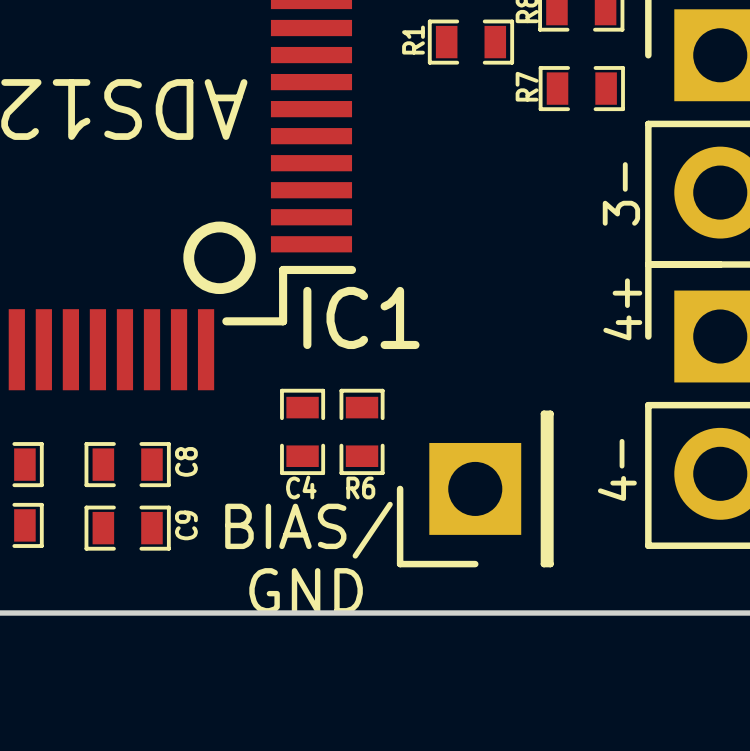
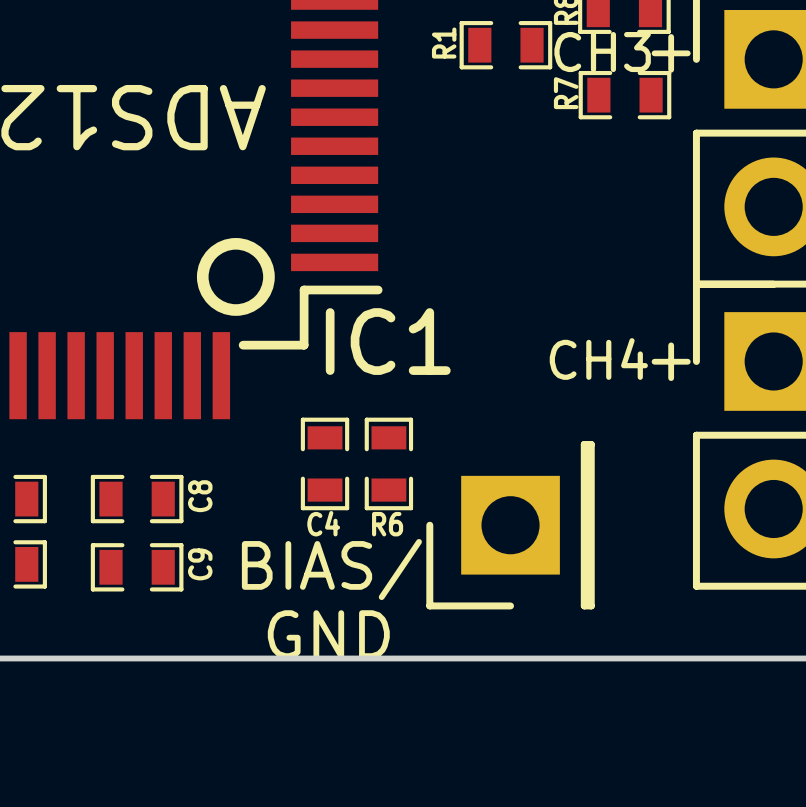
text: none -> CH3 (602, 52)
text: none -> + (671, 53)
text: 3- (621, 193) -> none
text: 4+ (622, 309) -> + (671, 361)
text: none -> CH4 (598, 359)
text: 4- (617, 469) -> none

